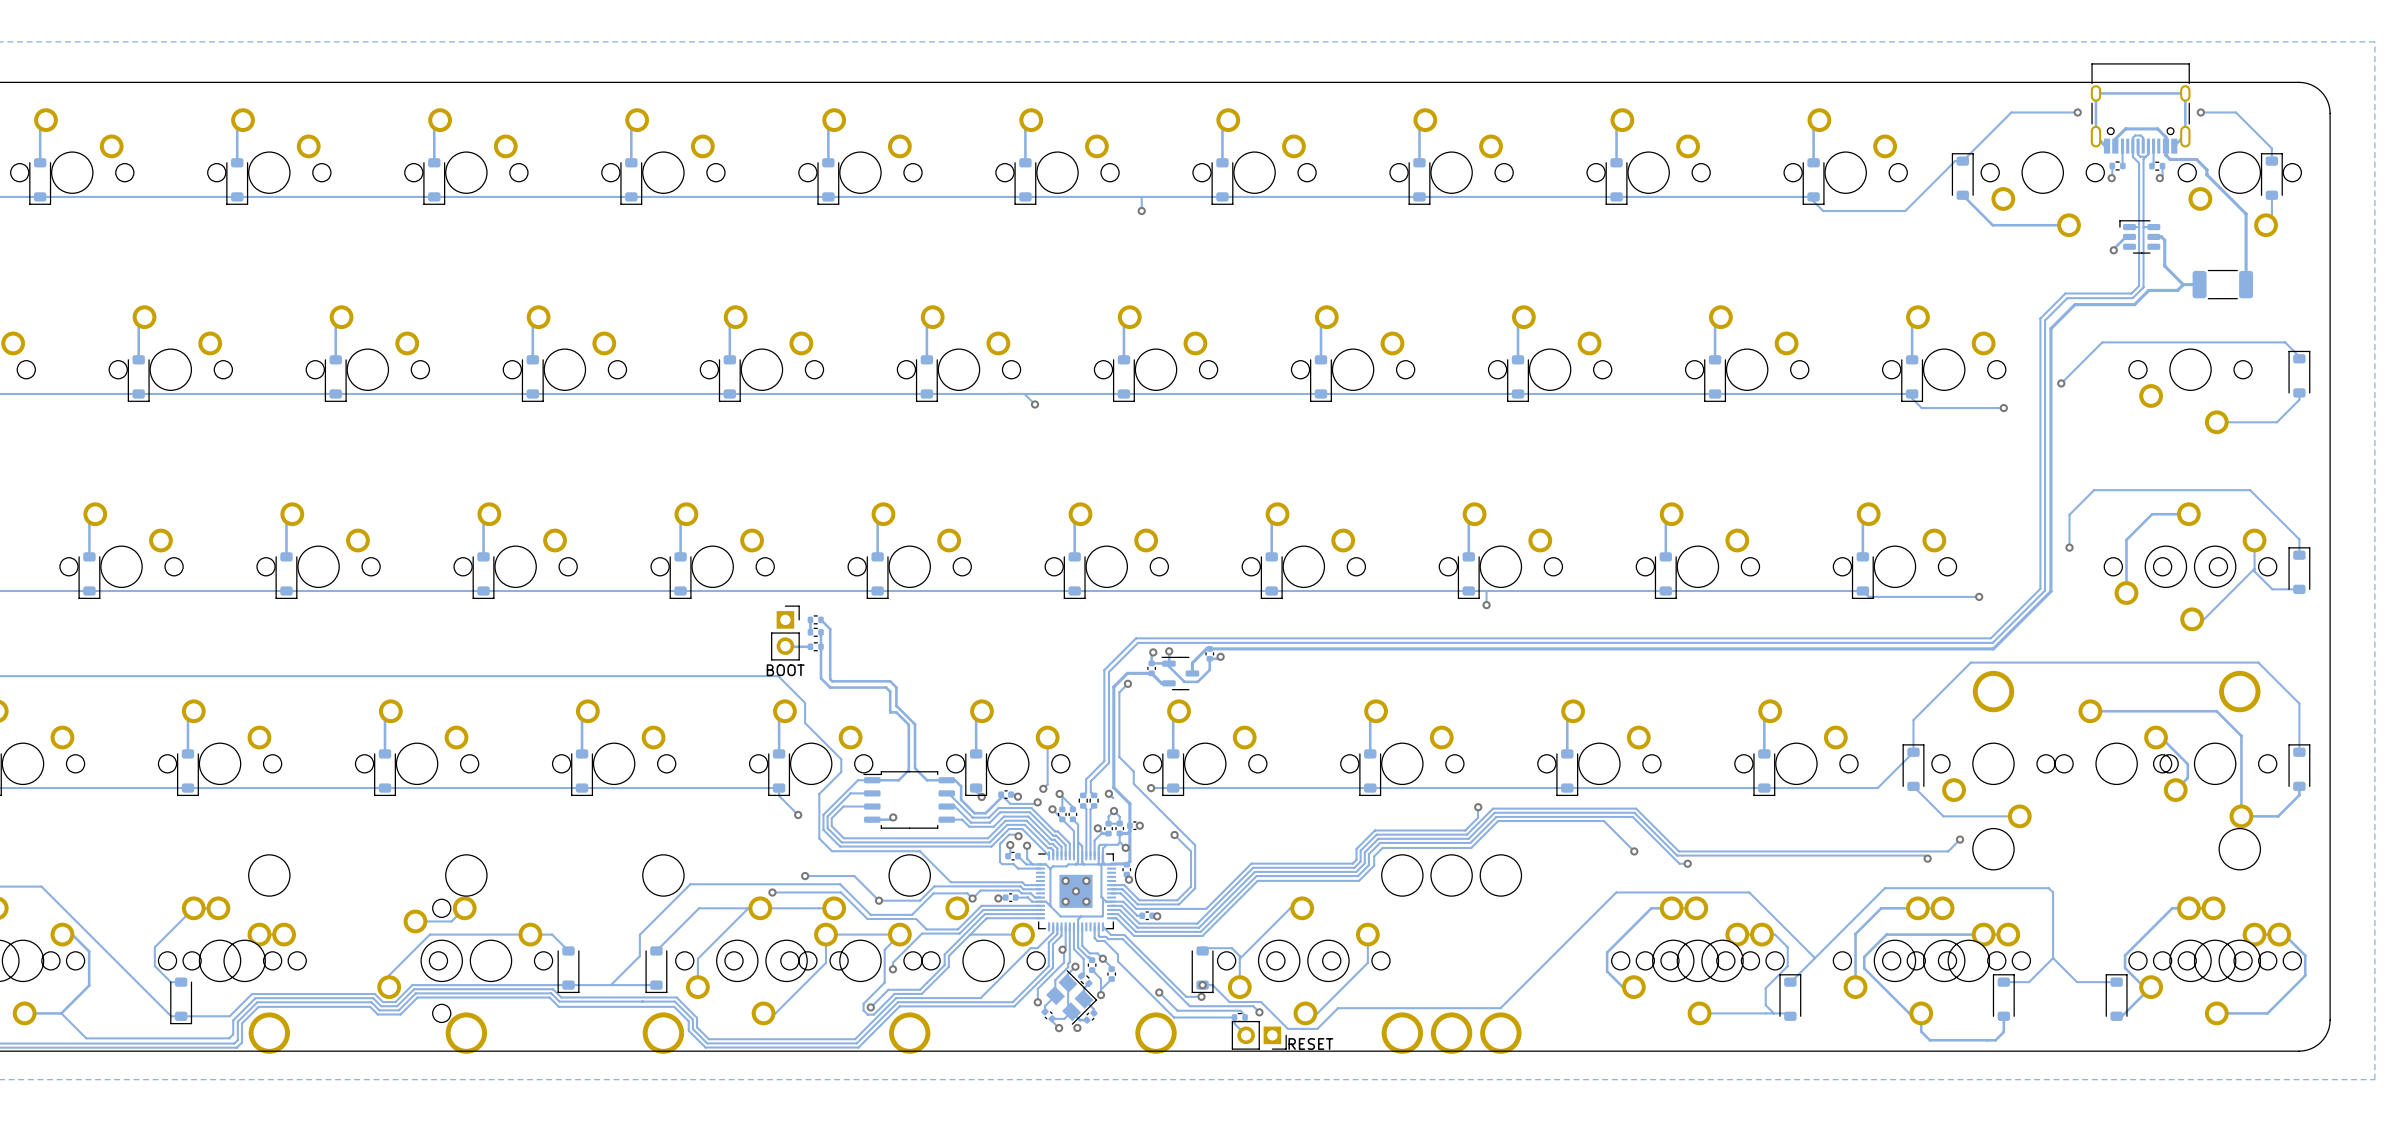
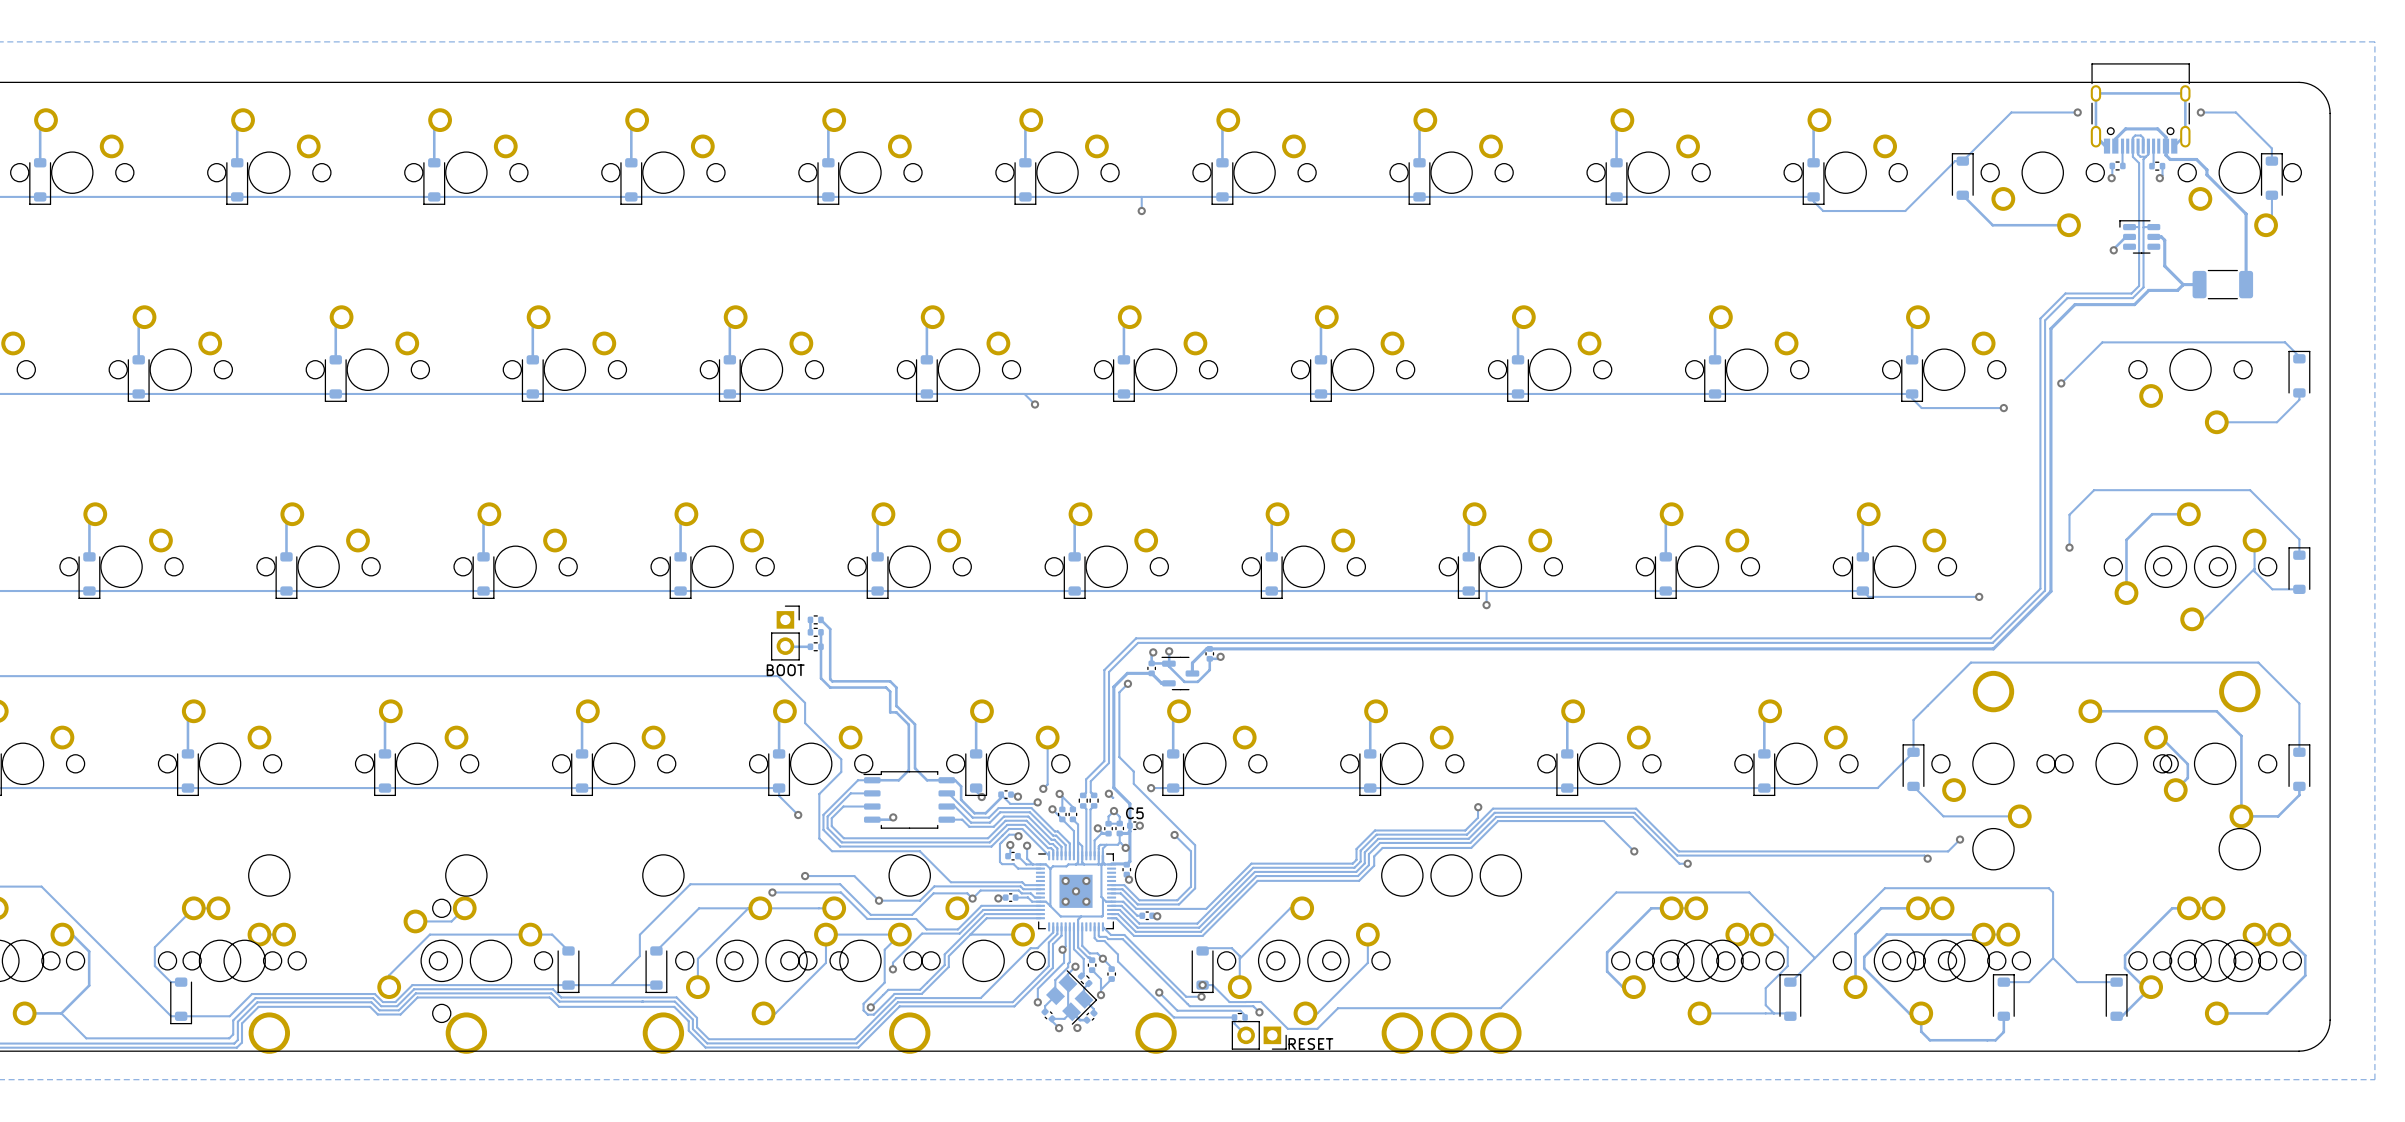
C5 name: none -> C5 (1134, 813)

